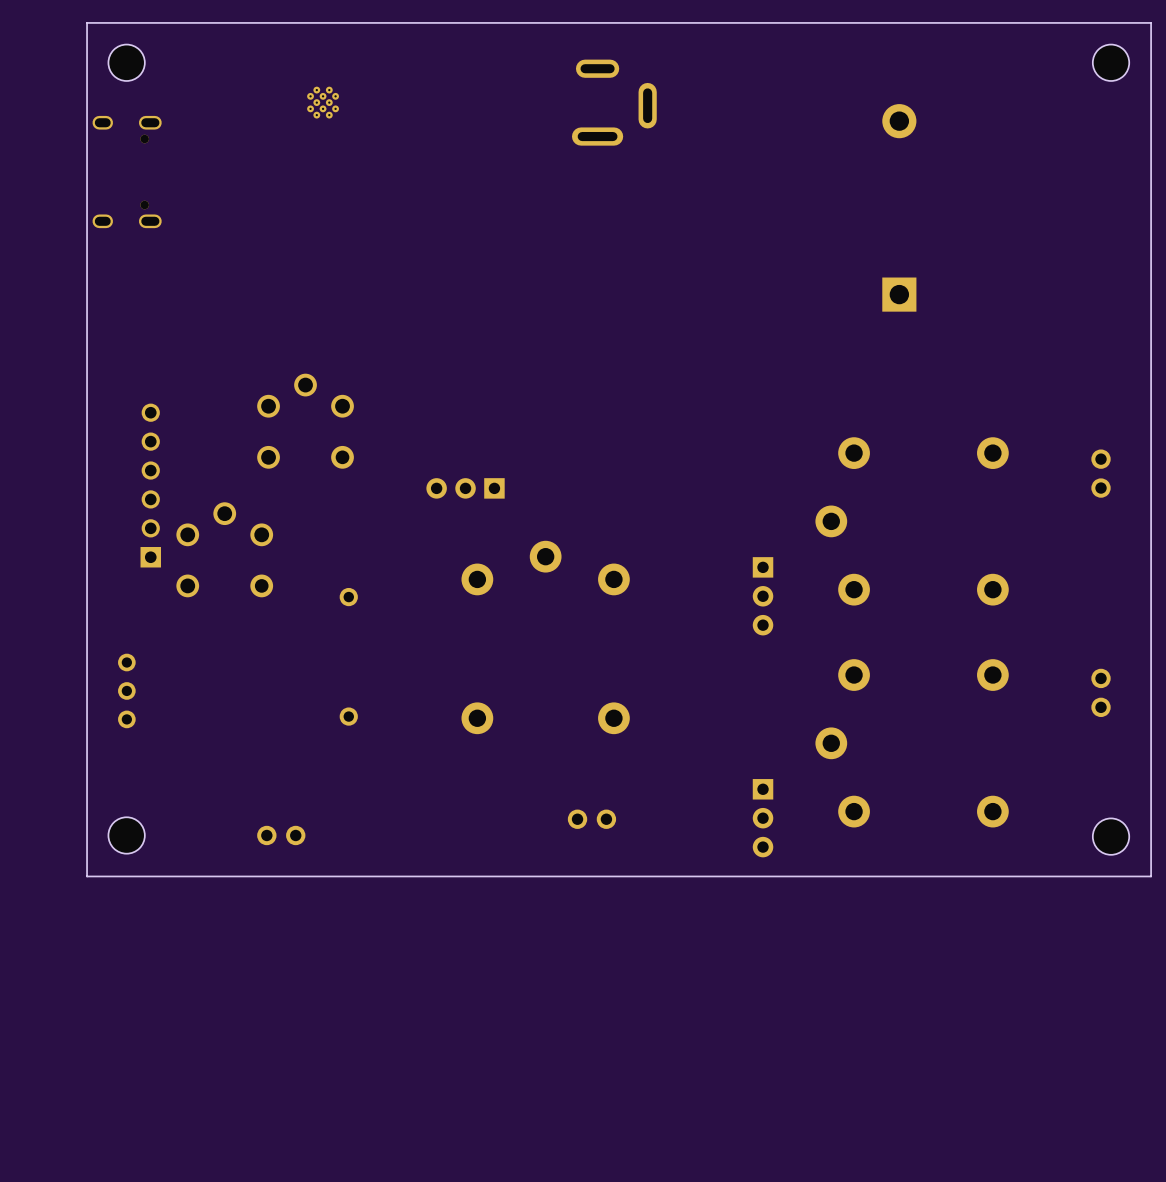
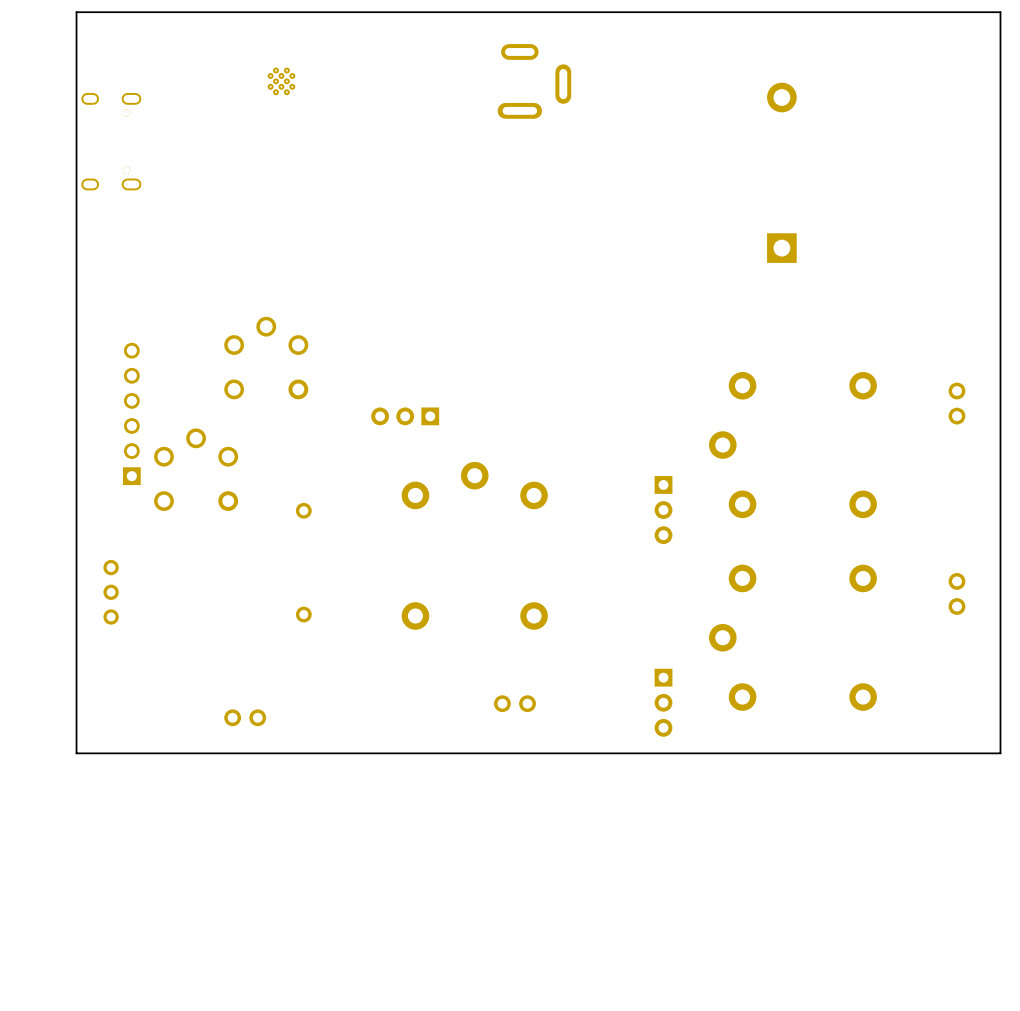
part: (126, 62) -> none
part: (1111, 62) -> none
part: (126, 835) -> none
part: (1111, 836) -> none

